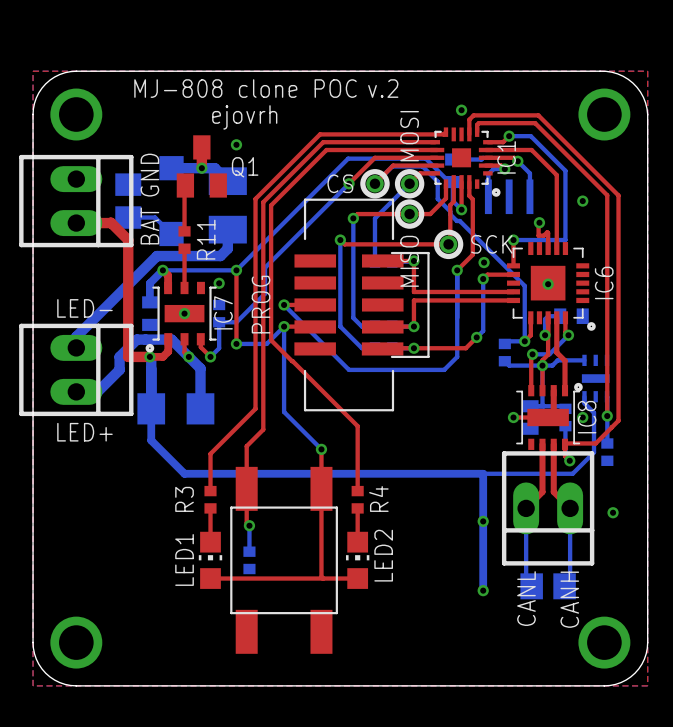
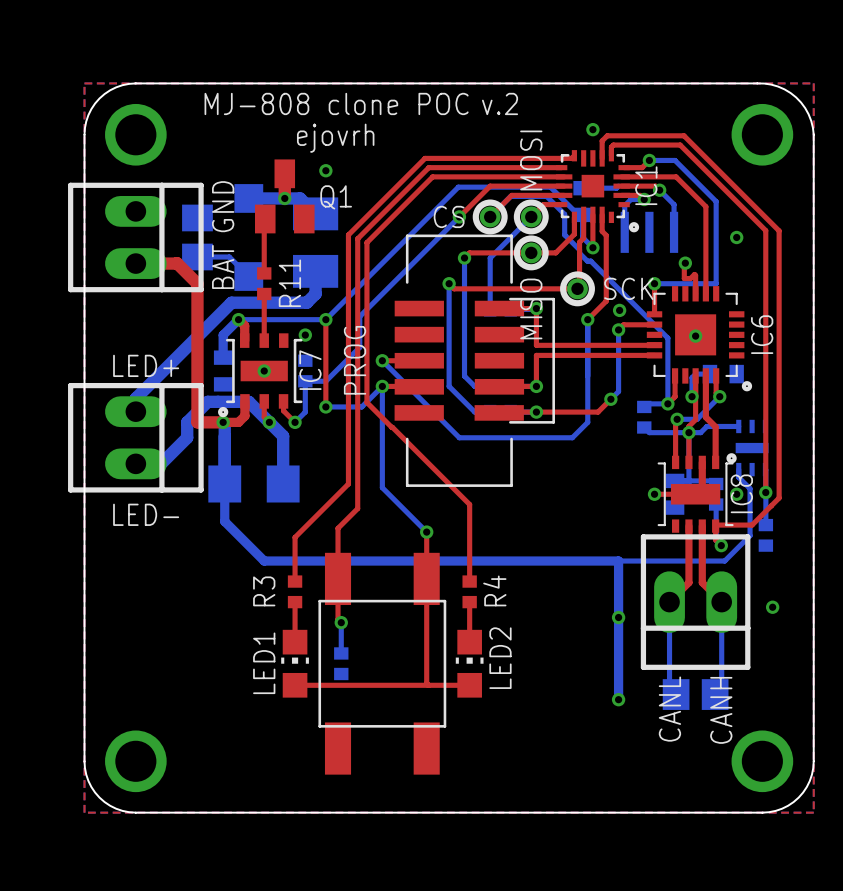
text: LED- (84, 308) -> LED+ (146, 365)
text: LED+ (84, 432) -> LED- (146, 514)

